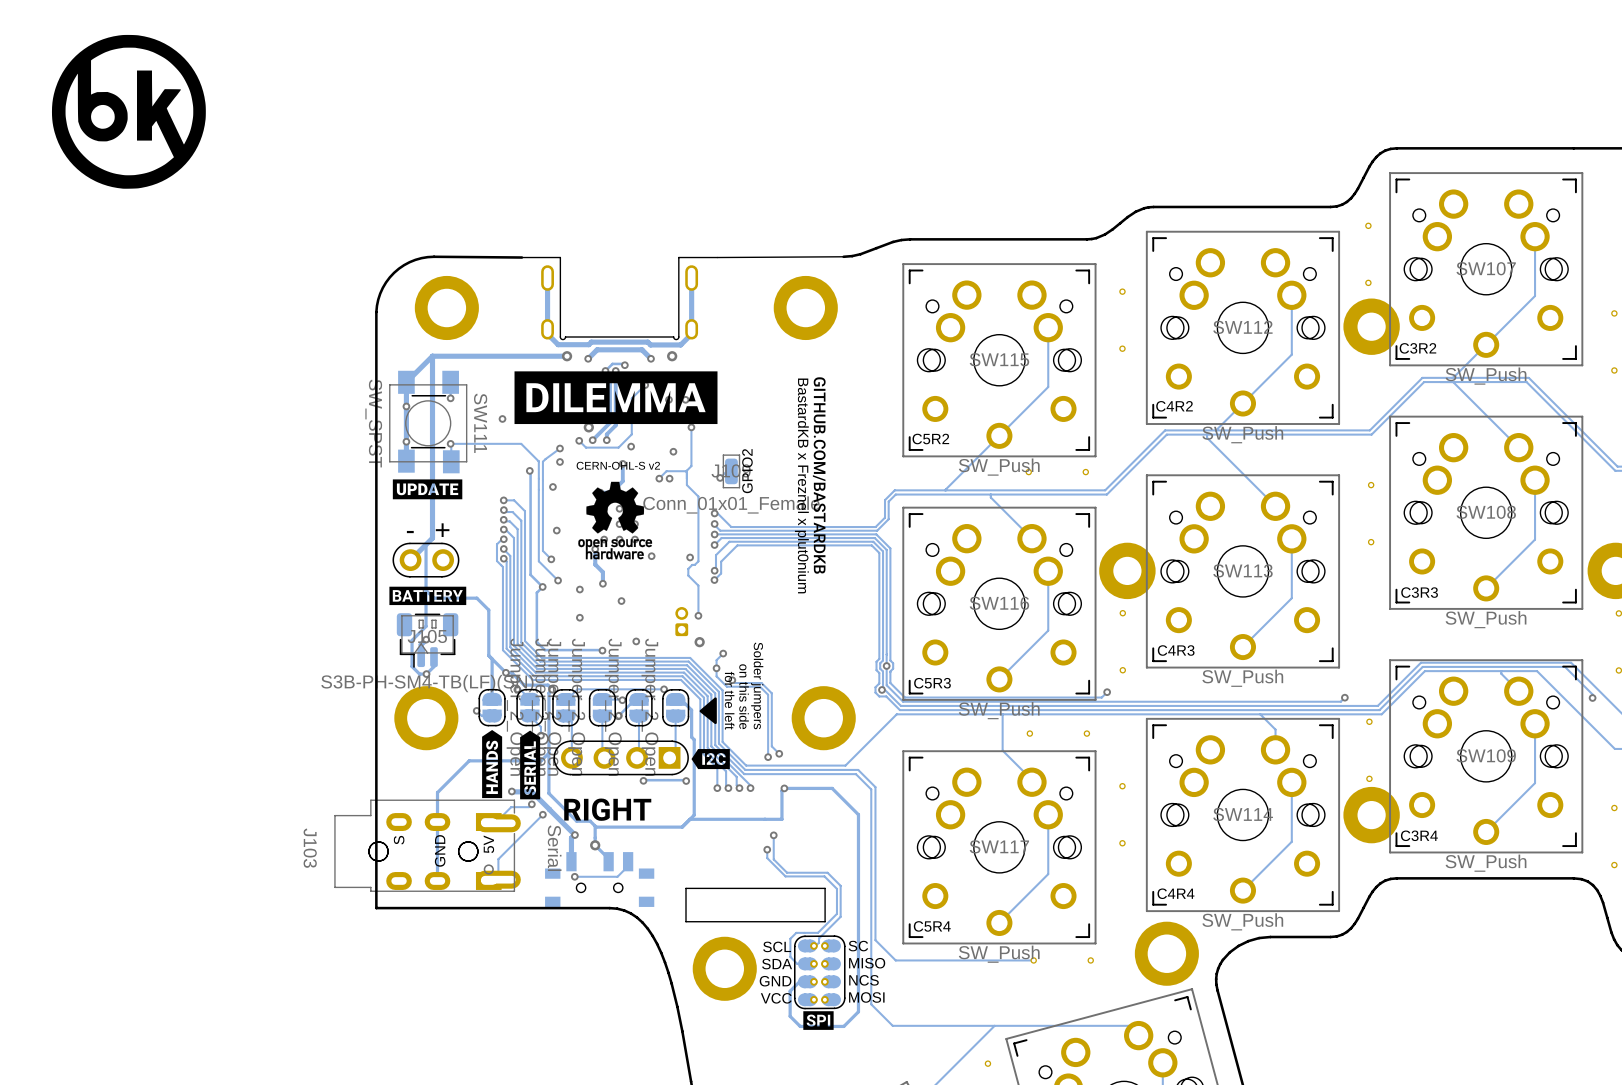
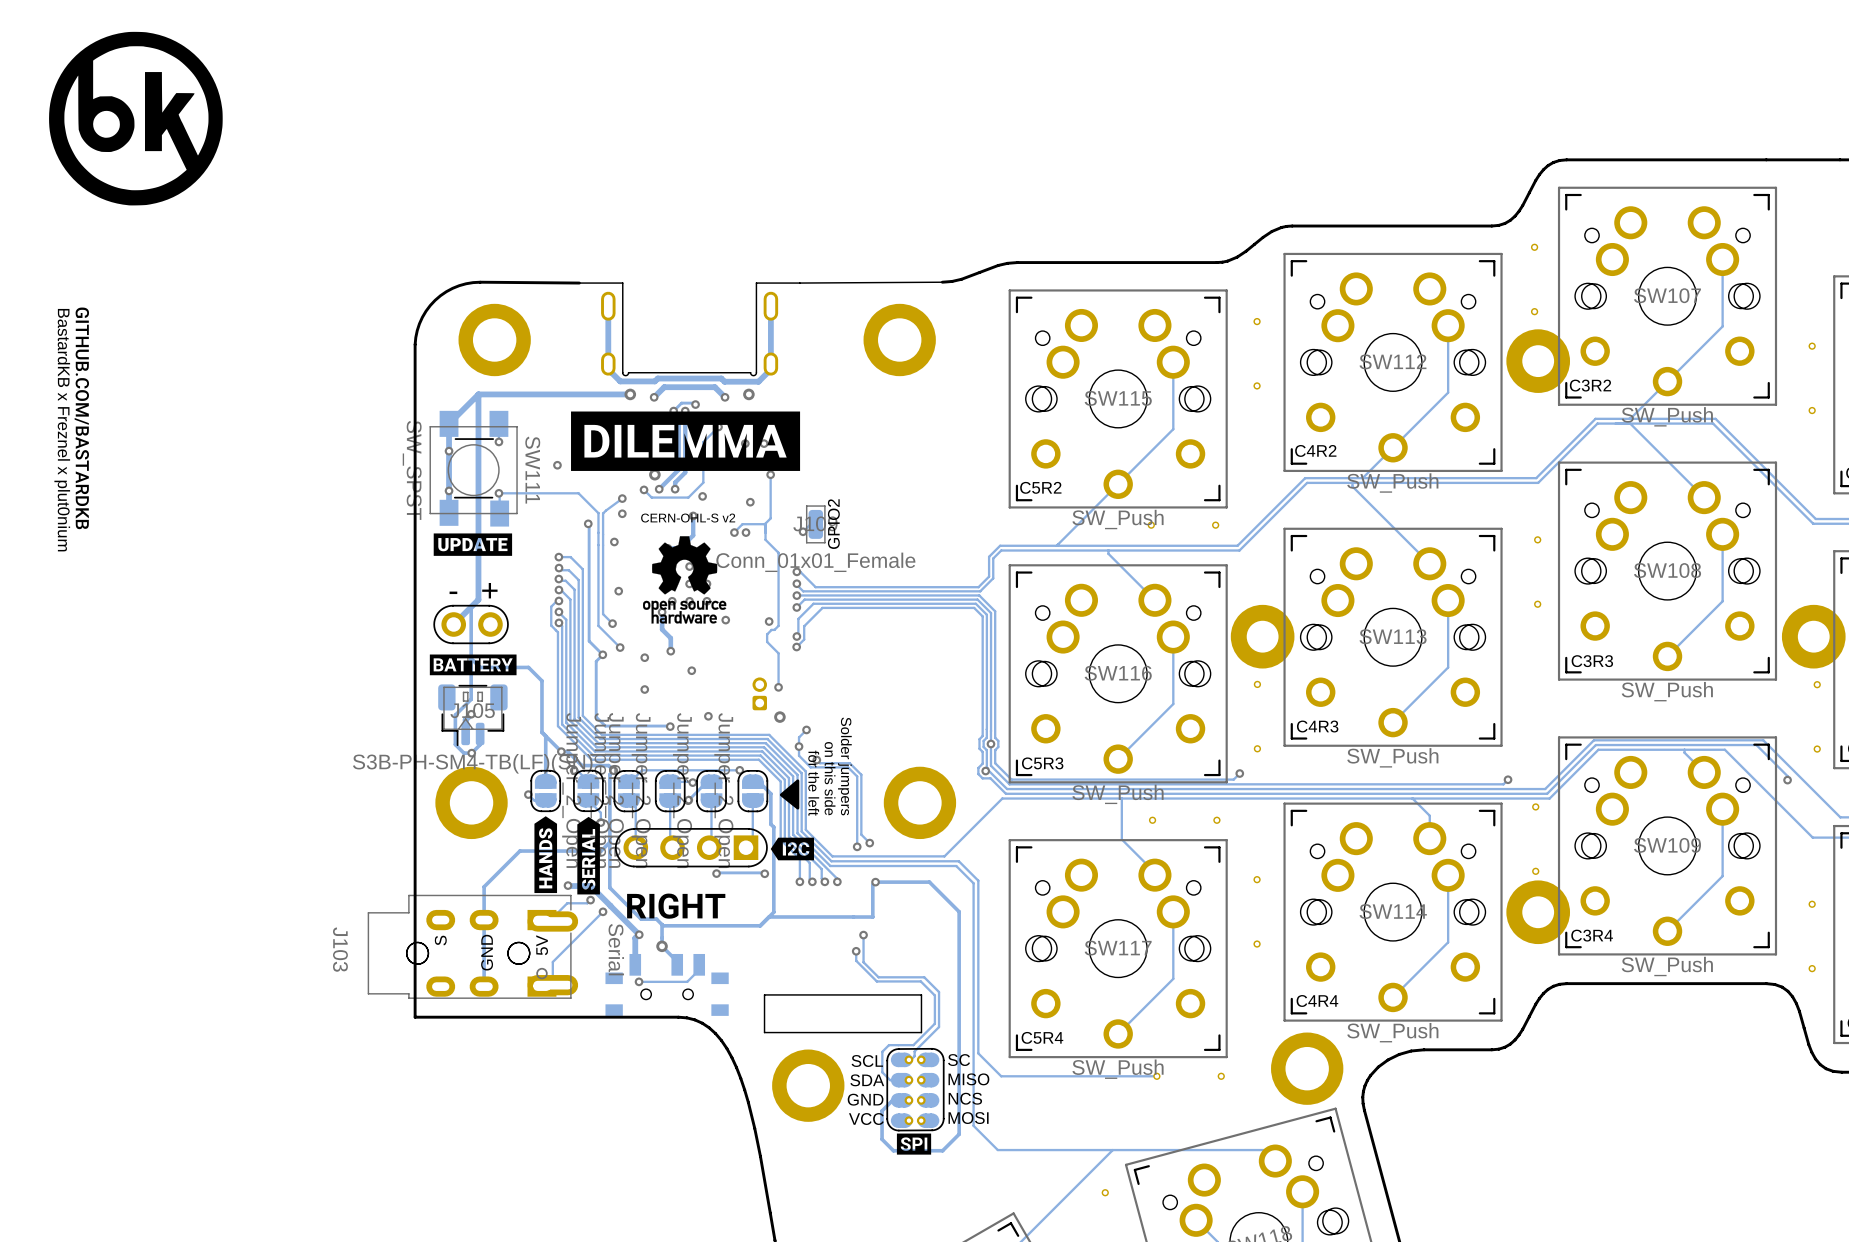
drawing: none -> [74, 307, 90, 530]
drawing: [812, 377, 826, 574] -> none
text: none -> BastardKB x Freznel x plut0nium (62, 430)
text: BastardKB x Freznel x plut0nium (801, 485) -> none

